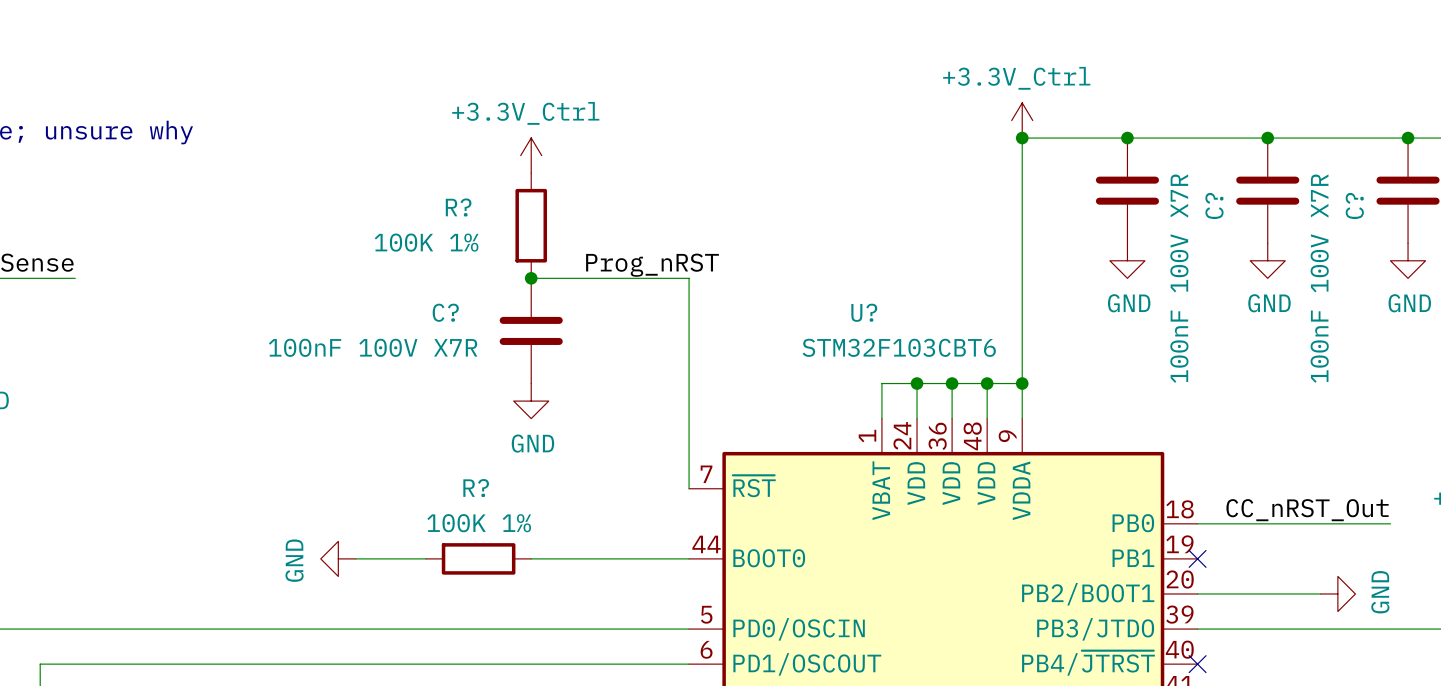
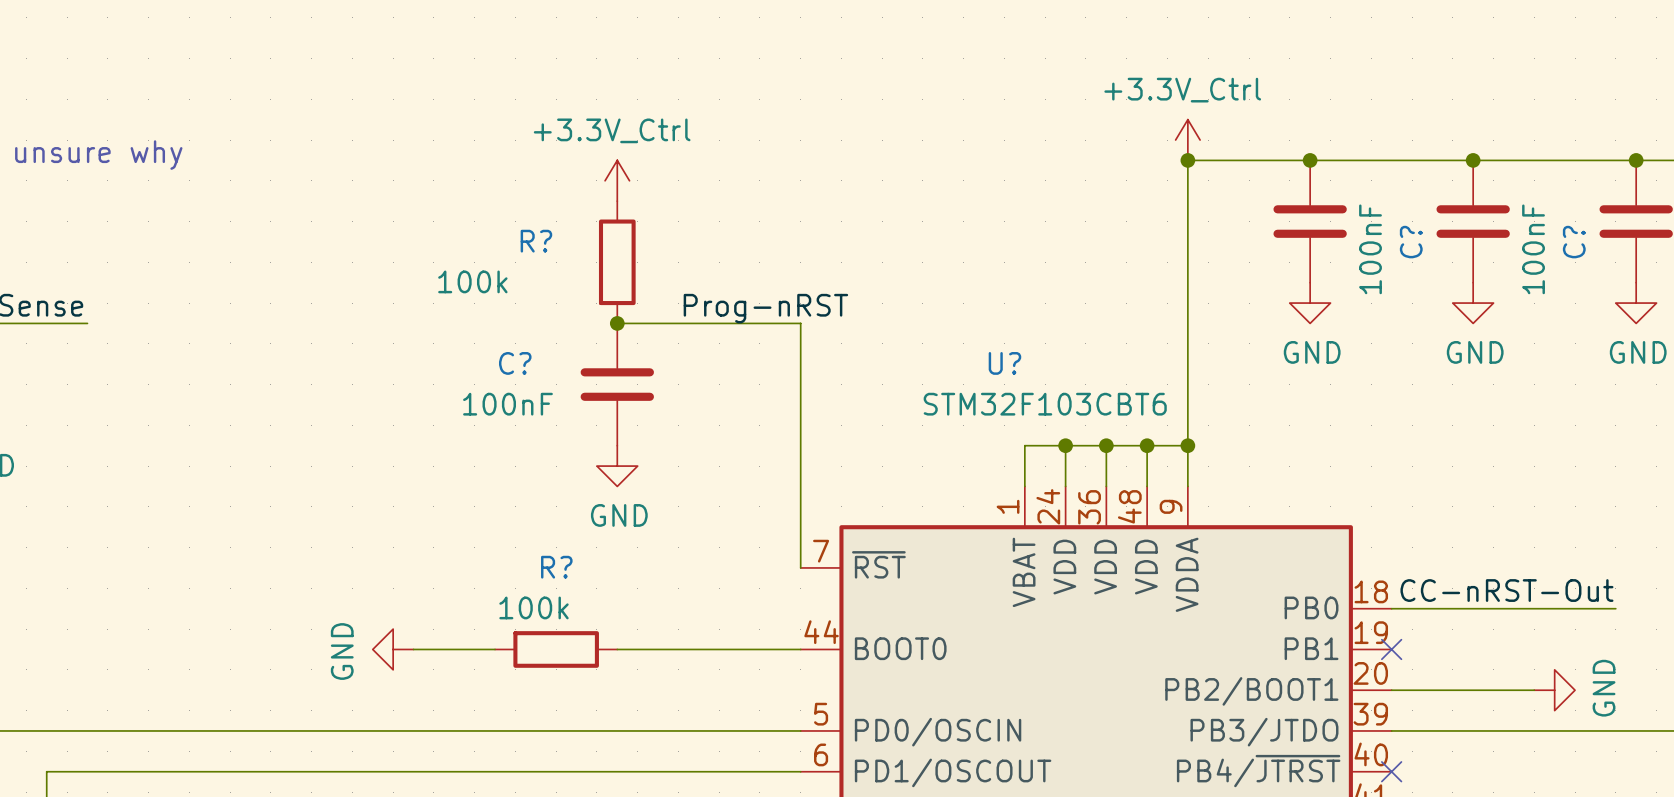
R? value: 100K 1% (426, 242) -> 100k (472, 281)
label: Prog_nRST (652, 265) -> Prog-nRST (765, 308)
C? value: 100nF 100V X7R (1179, 278) -> 100nF (1370, 249)
C? value: 100nF 100V X7R (1319, 278) -> 100nF (1533, 249)
C? value: 100nF 100V X7R (373, 347) -> 100nF (507, 404)
label: CC_nRST_Out (1307, 510) -> CC-nRST-Out (1506, 590)
R? value: 100K 1% (479, 523) -> 100k (534, 607)

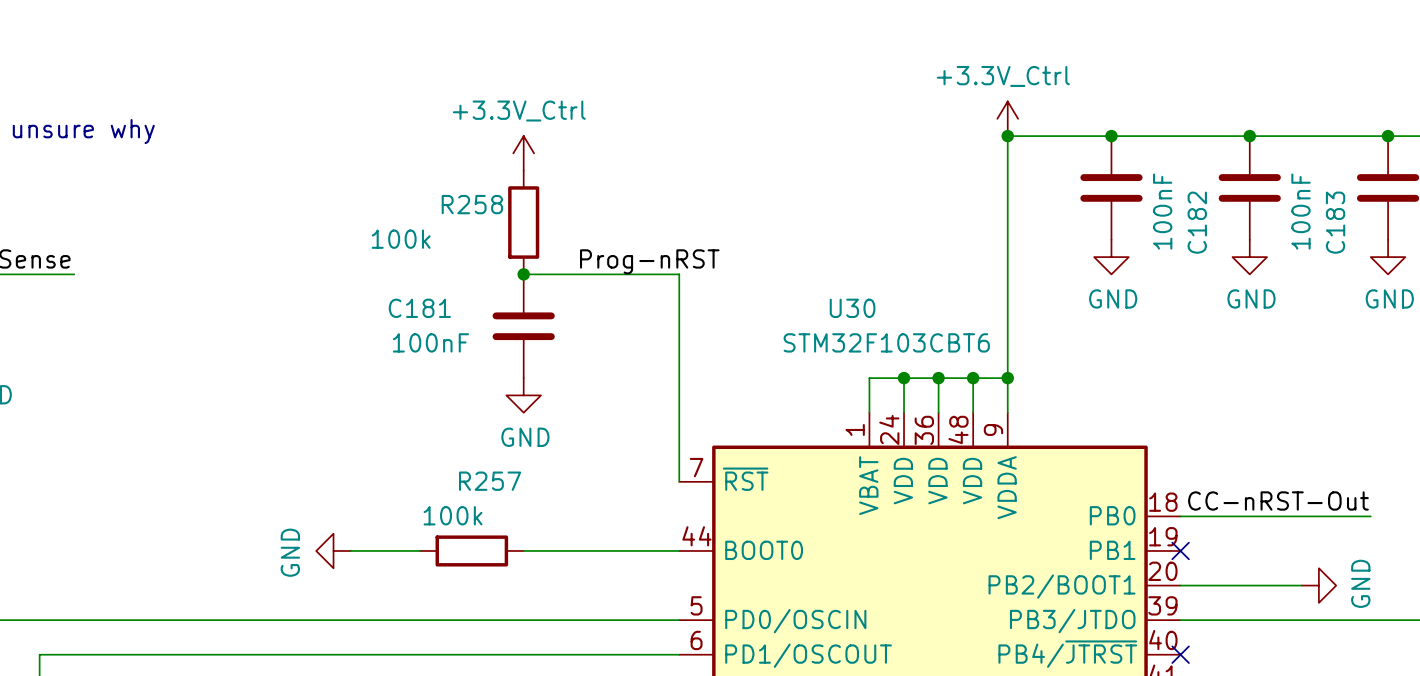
R? name: R? (536, 241) -> R258 (472, 204)
C? name: C? (1411, 242) -> C182 (1197, 222)
C? name: C? (1574, 242) -> C183 (1335, 222)
C? name: C? (515, 363) -> C181 (419, 308)
U? name: U? (1004, 363) -> U30 (852, 308)
R? name: R? (556, 567) -> R257 (490, 481)

